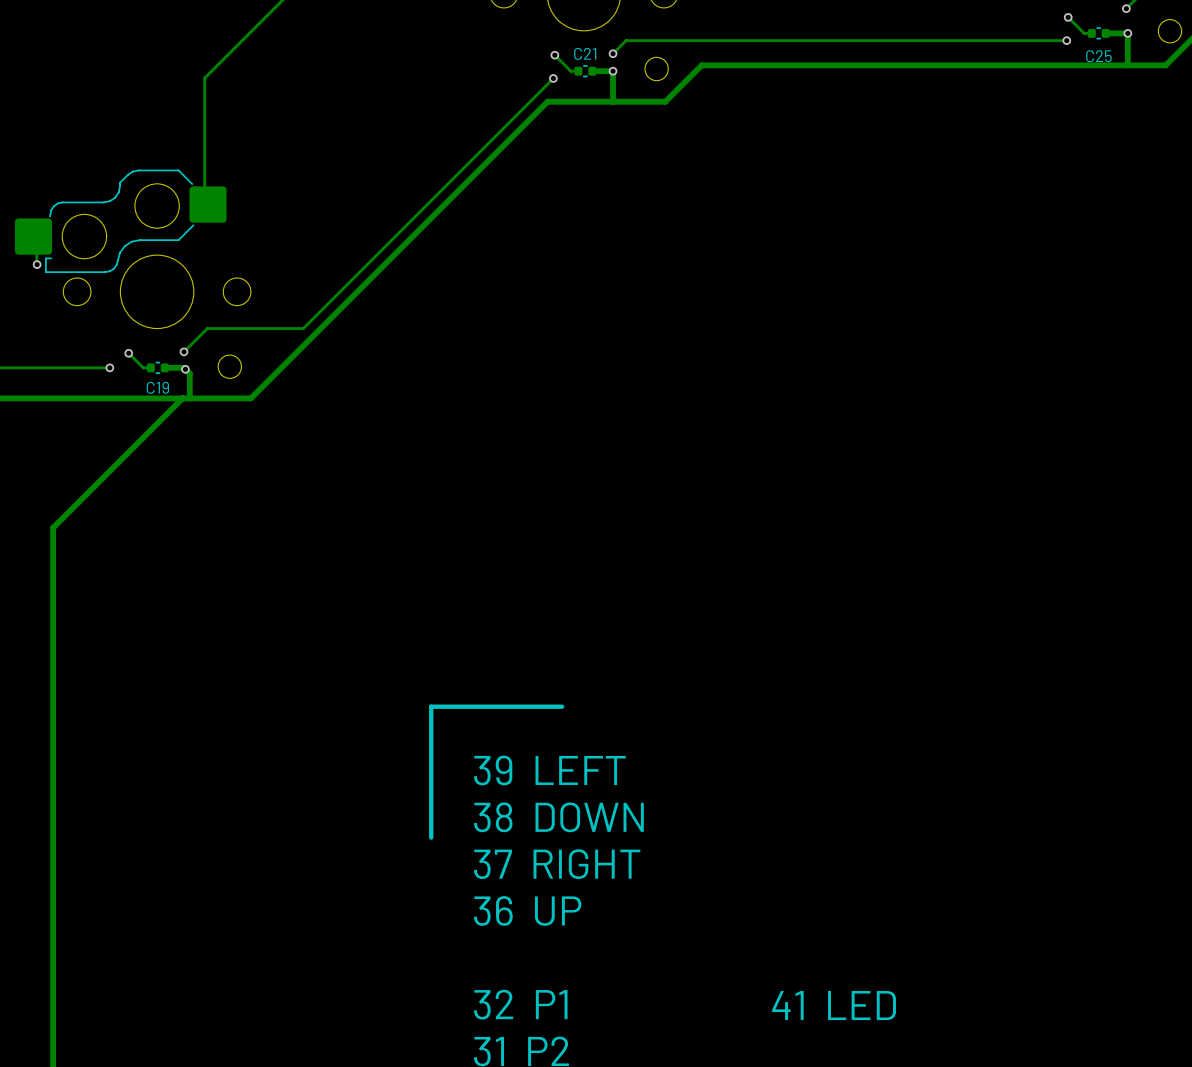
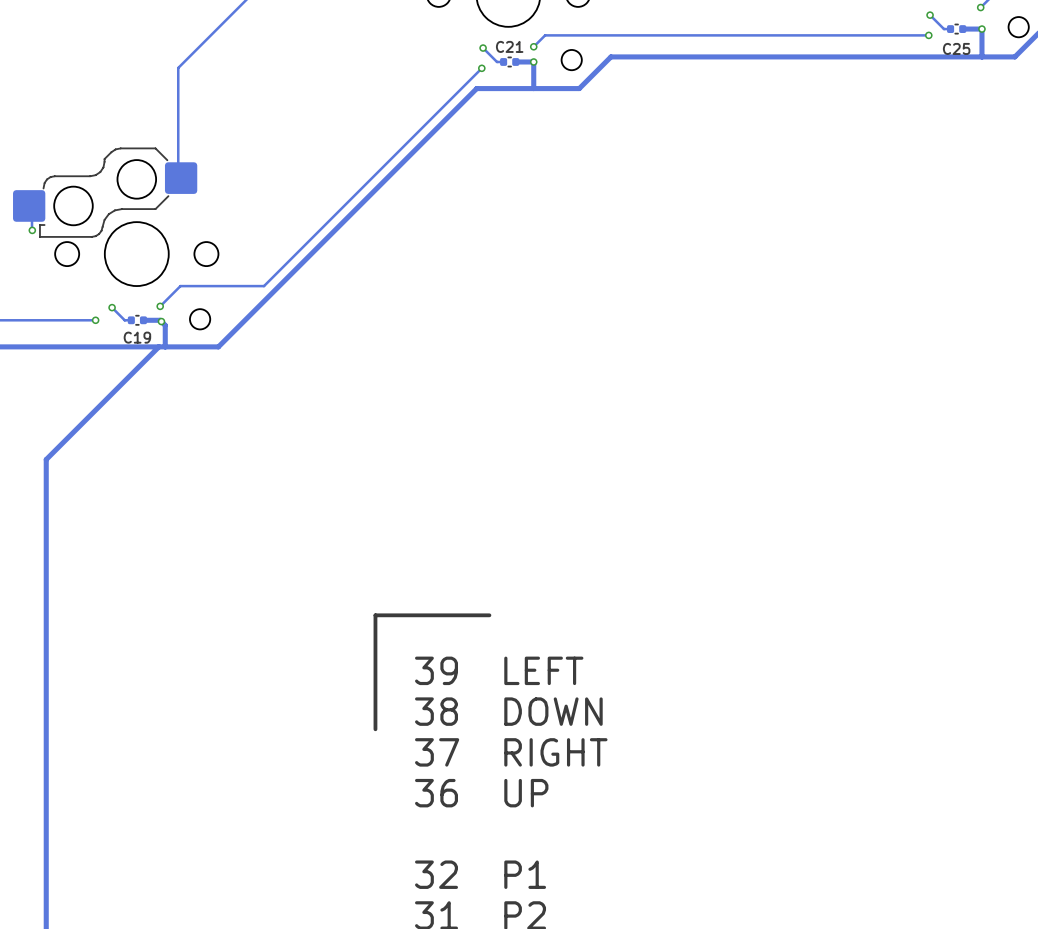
text: 41 LED (834, 1005) -> none

